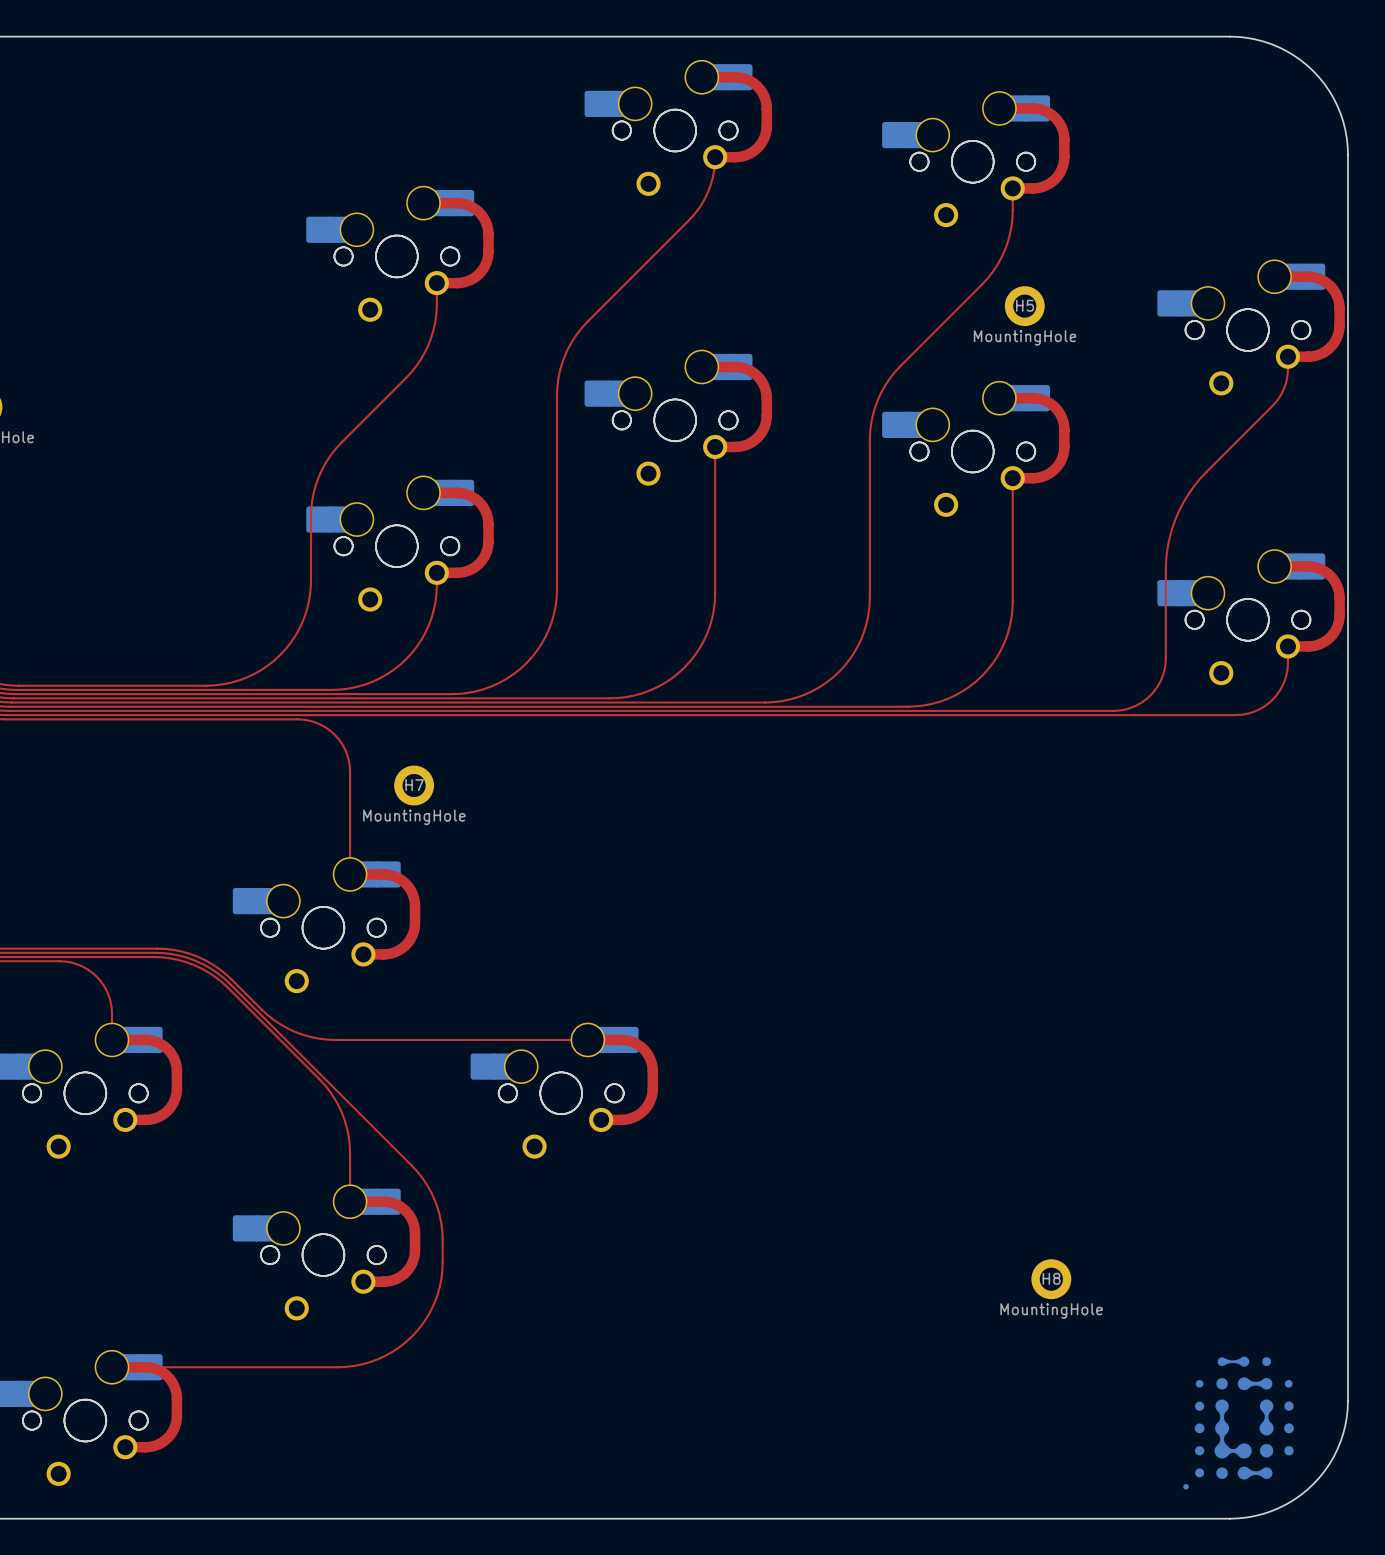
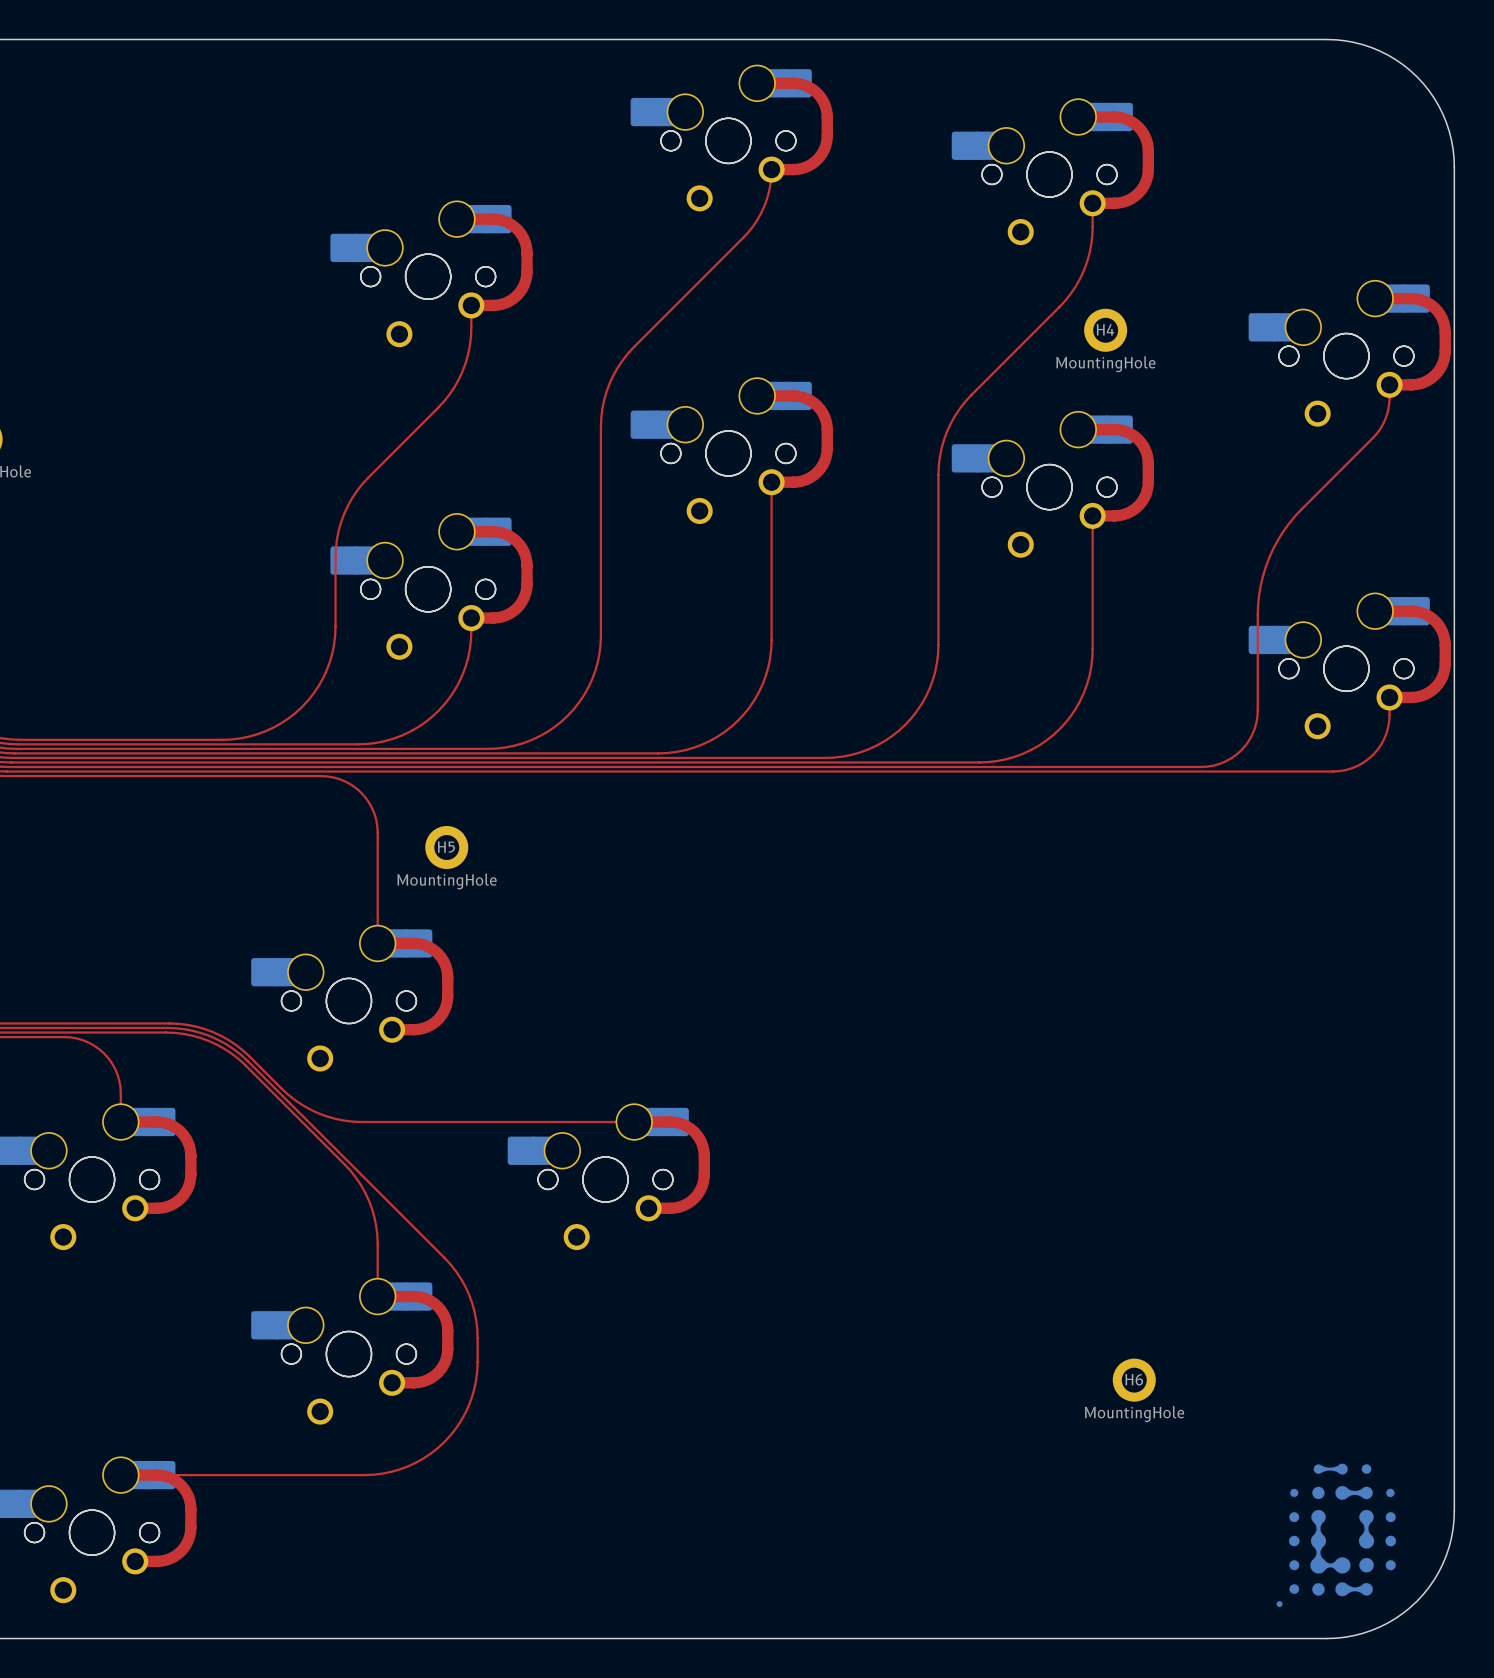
H5 name: H5 (1025, 305) -> H4 (1105, 329)
H7 name: H7 (414, 785) -> H5 (446, 847)
H8 name: H8 (1051, 1278) -> H6 (1134, 1379)

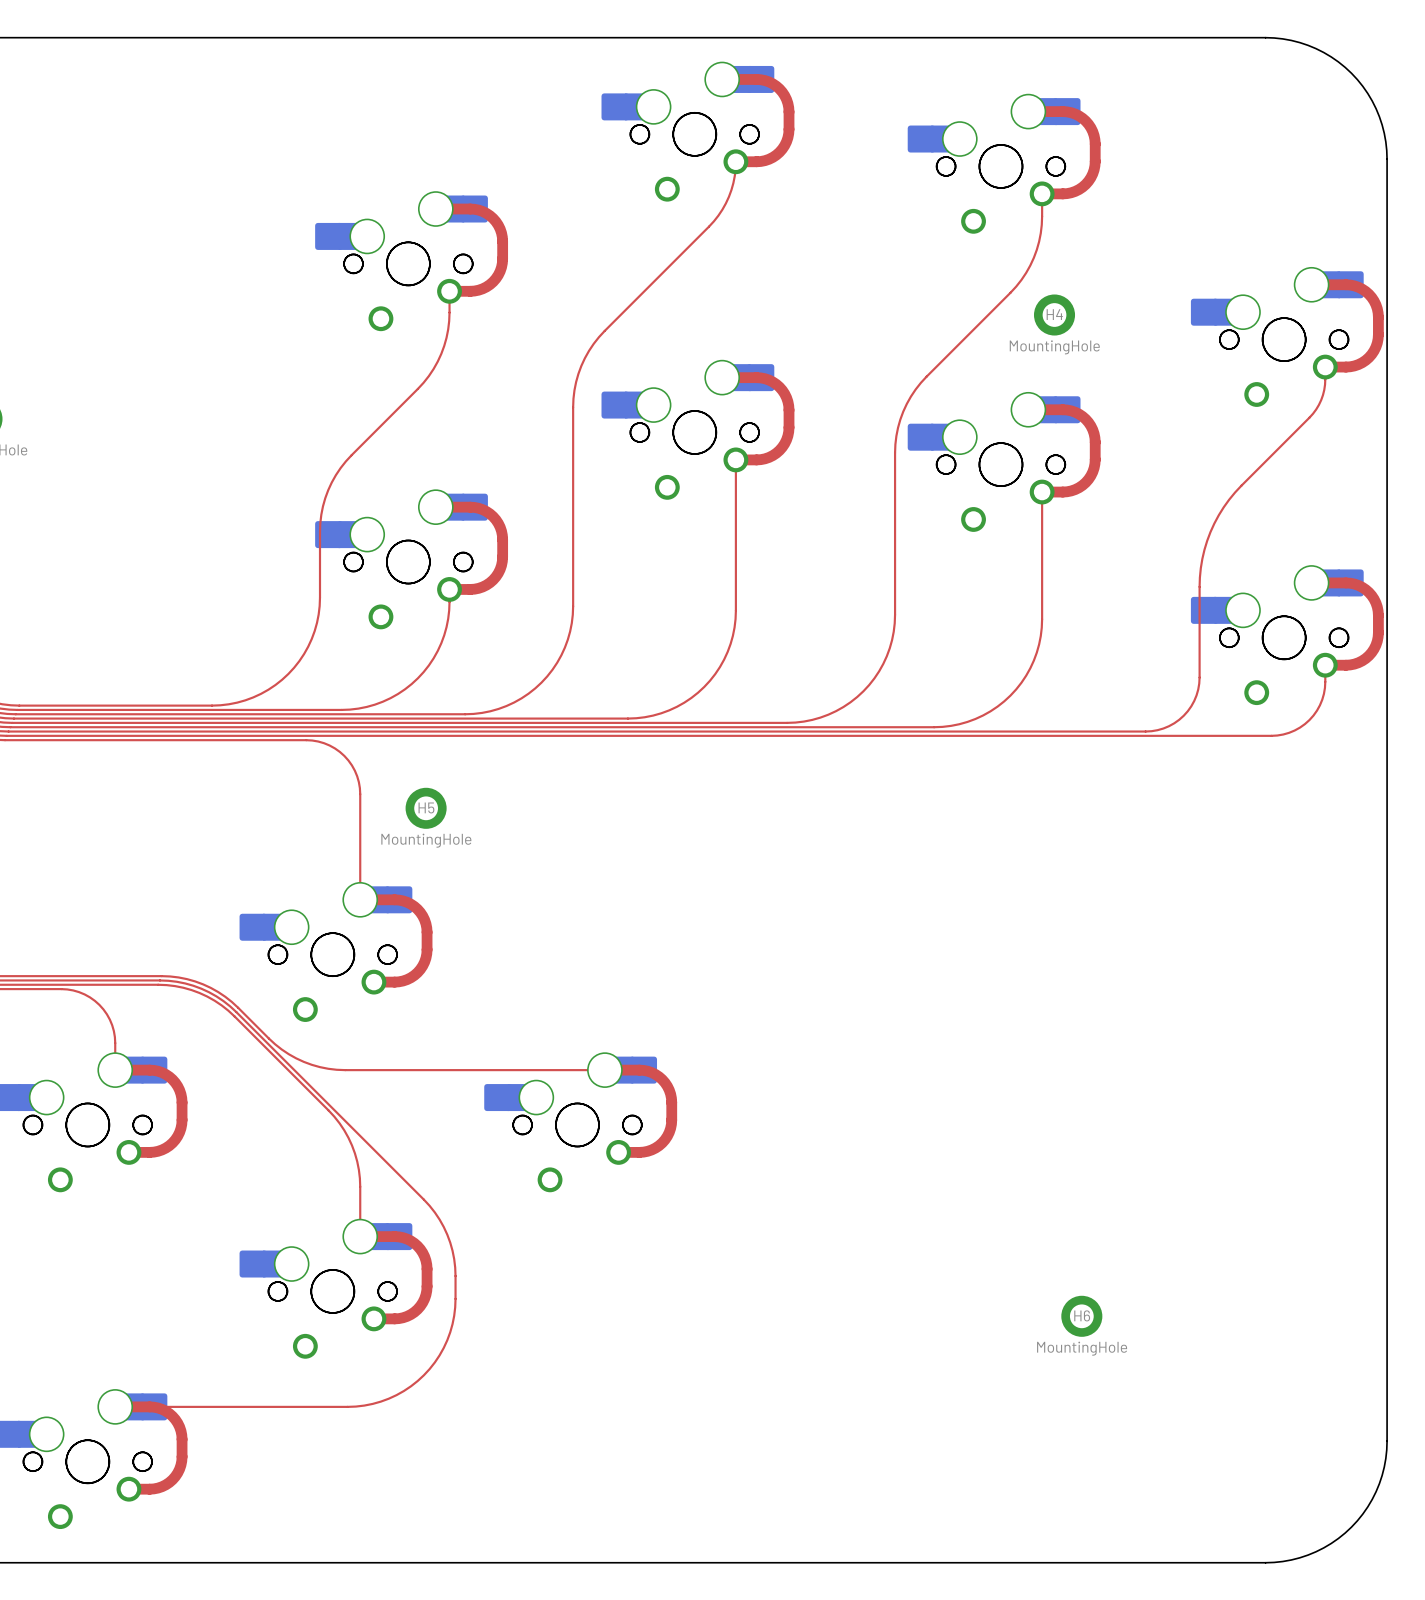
drawing: [1276, 1463, 1397, 1608] -> none

